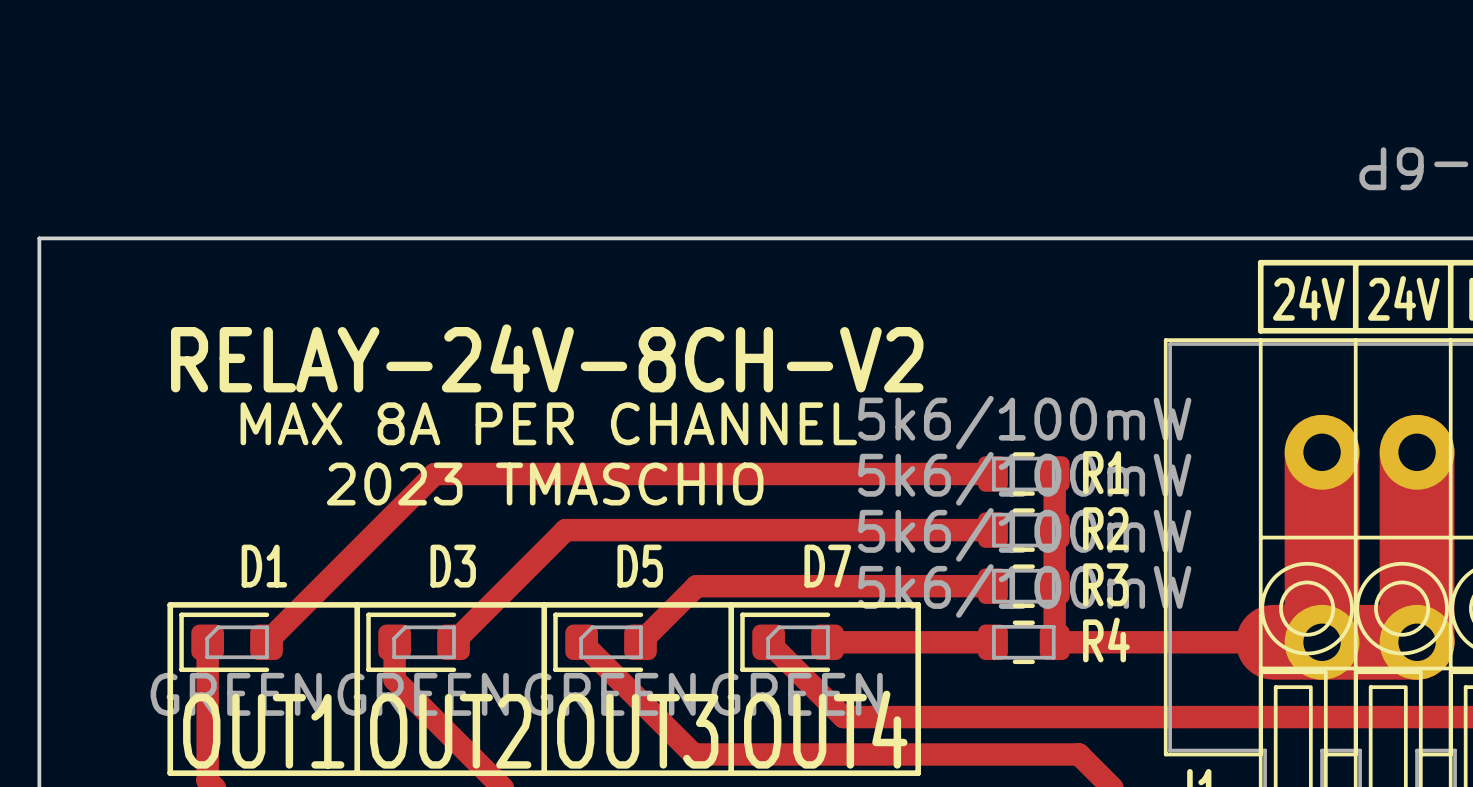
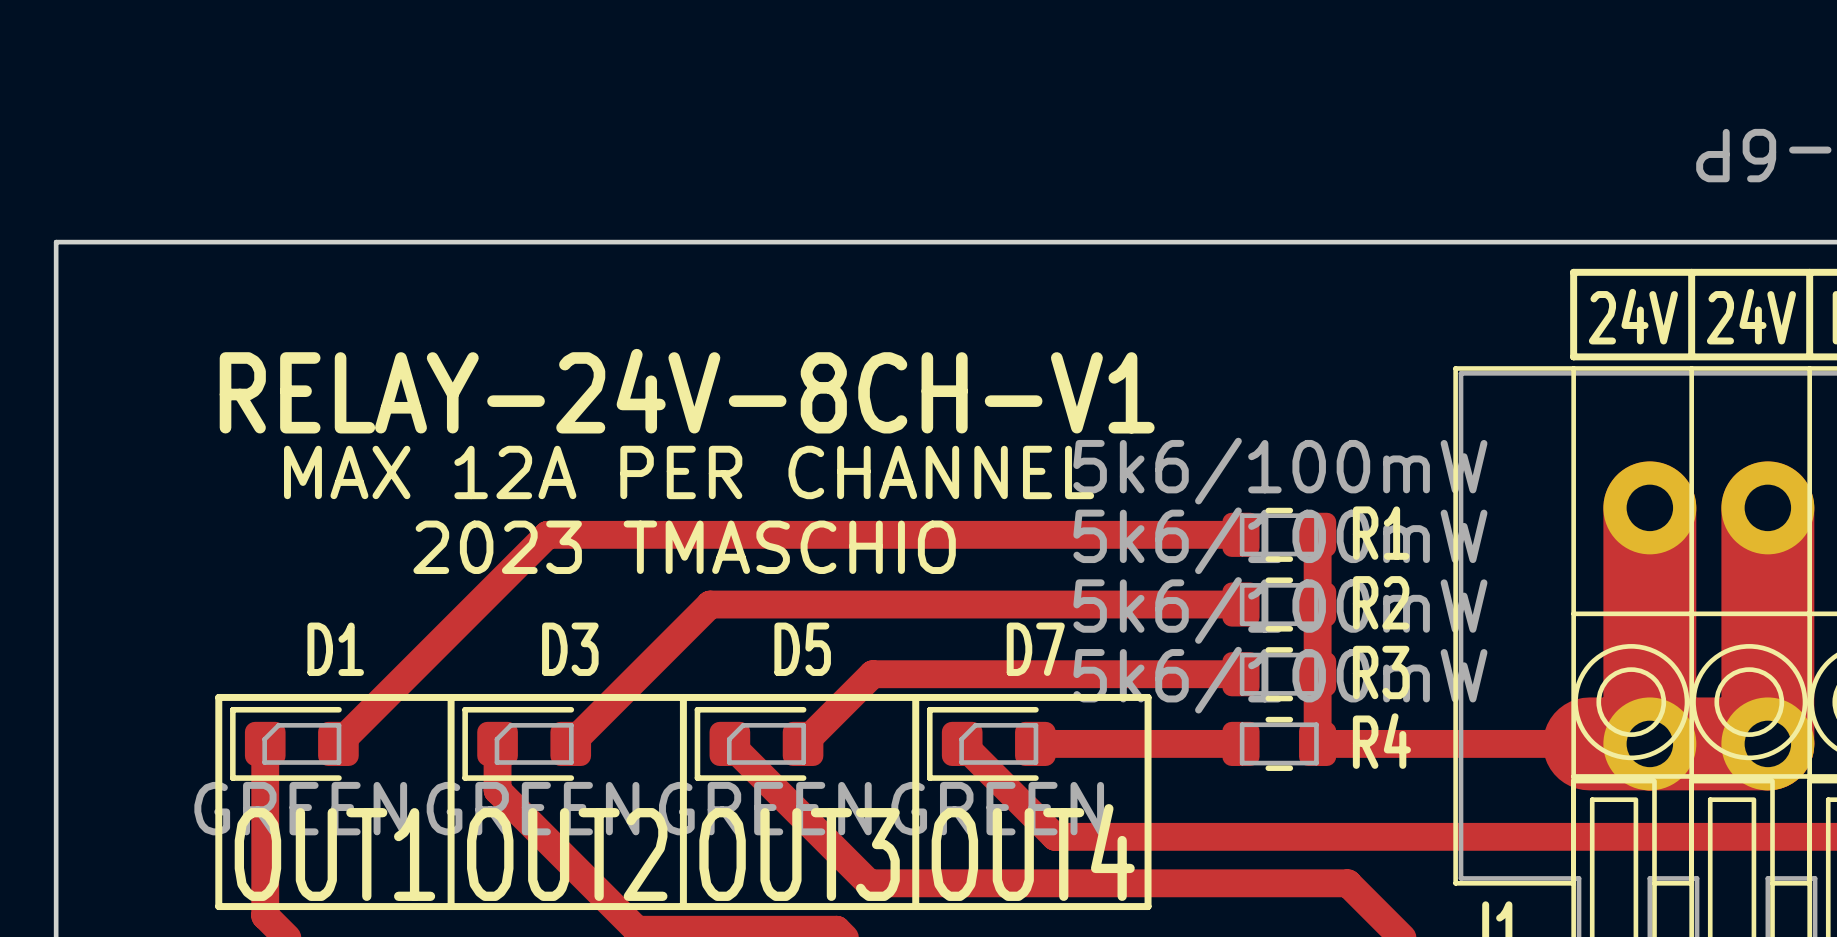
text: RELAY-24V-8CH-V2 (547, 358) -> RELAY-24V-8CH-V1 (687, 391)
text: MAX 8A PER CHANNEL (548, 423) -> MAX 12A PER CHANNEL (689, 472)

